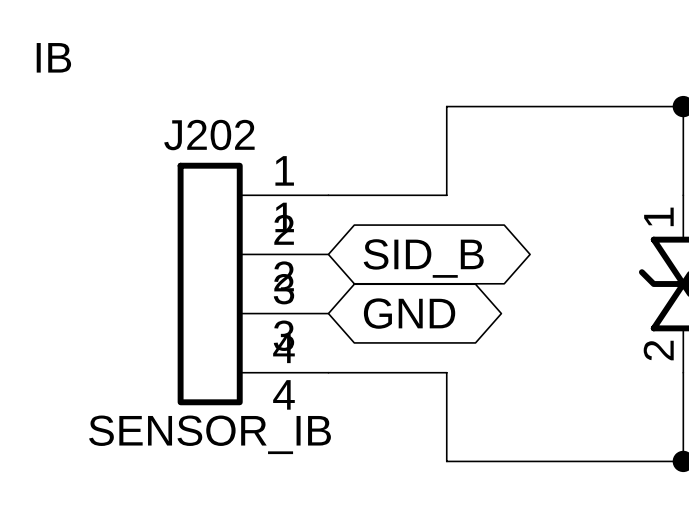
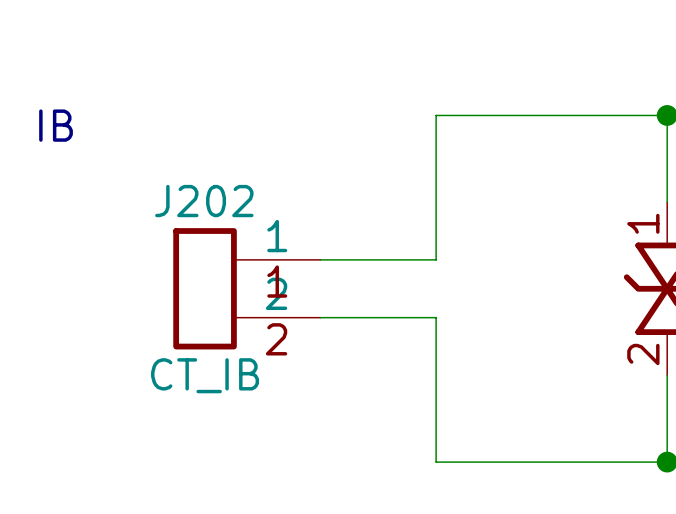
text position: IB (53, 57) -> IB (56, 125)
J202 name position: J202 (209, 135) -> J202 (204, 201)
J202 symbol: [177, 162, 329, 406] -> [173, 228, 321, 350]
wire: (328, 195) (446, 195) -> (320, 259) (436, 259) (436, 202)
global label: SID_B (423, 258) -> none
global label: GND (409, 313) -> none
wire: (328, 372) (446, 372) -> (320, 317) (436, 317) (436, 375)
J202 value: SENSOR_IB (210, 434) -> CT_IB (205, 375)

